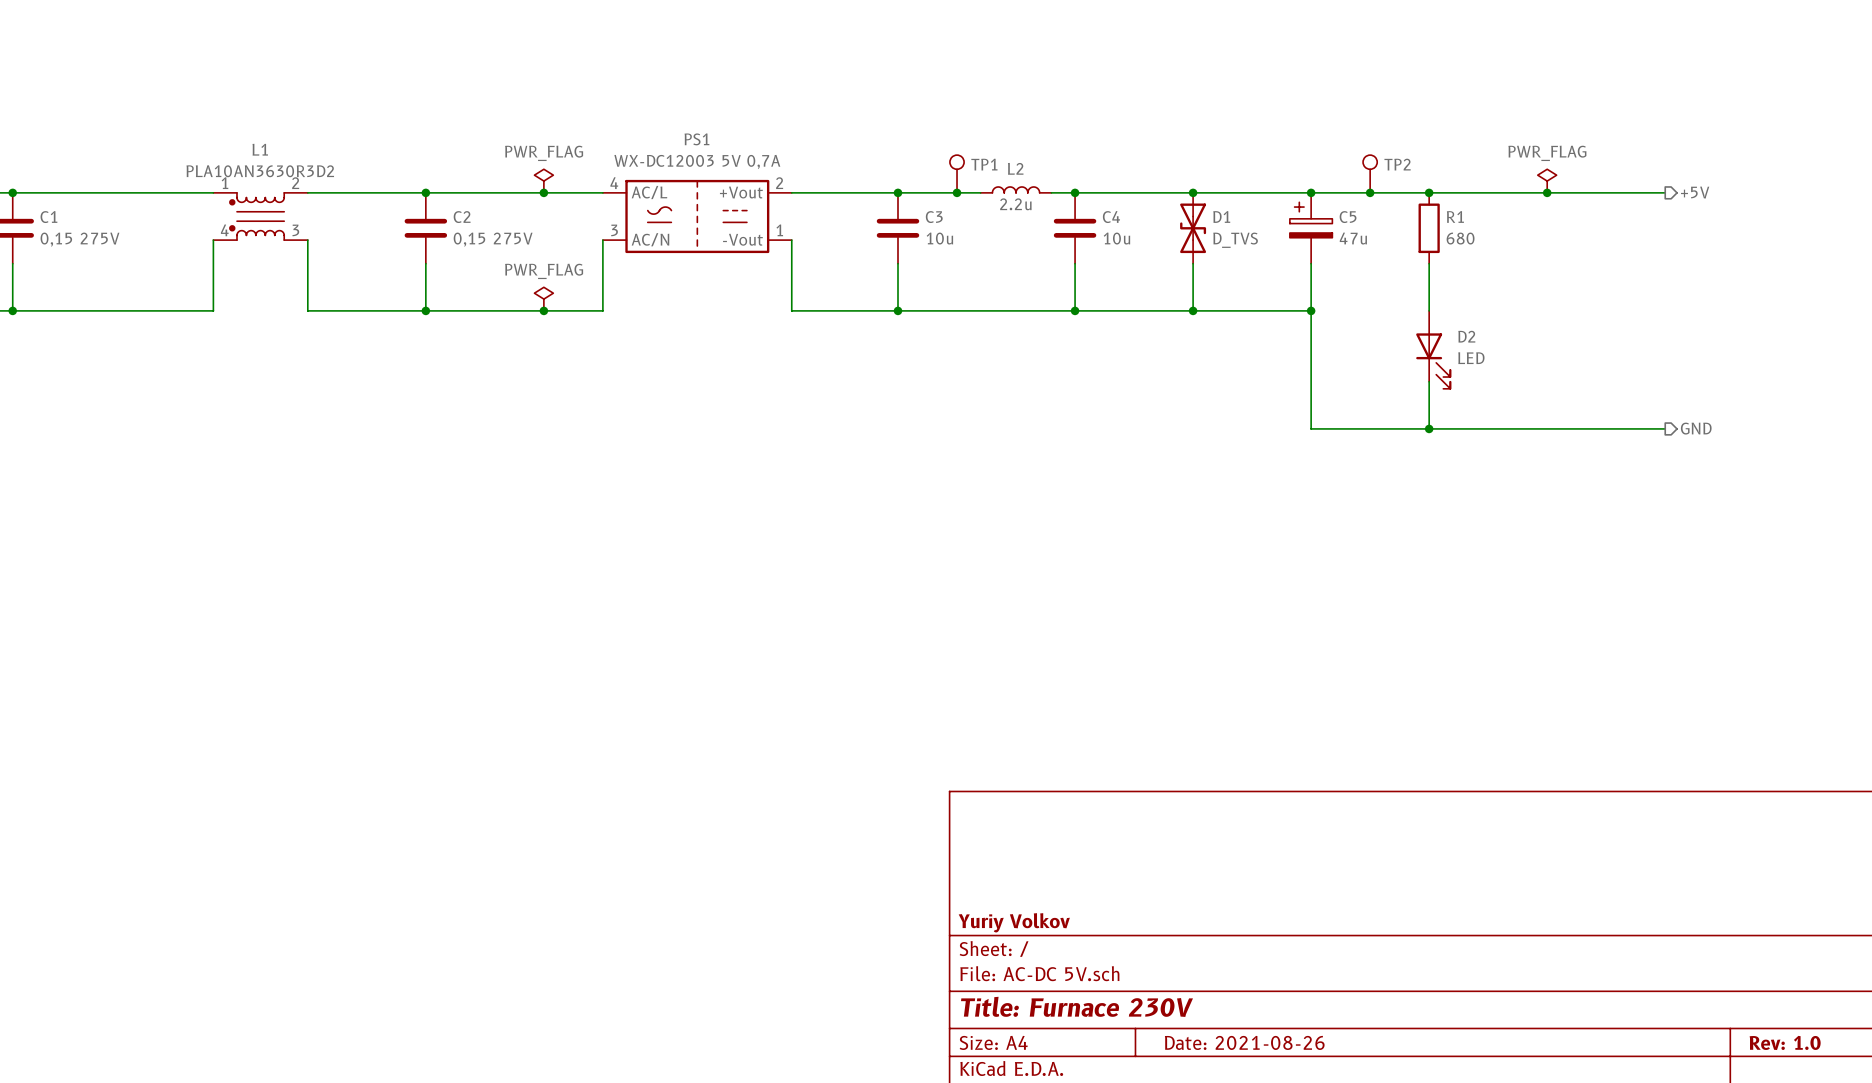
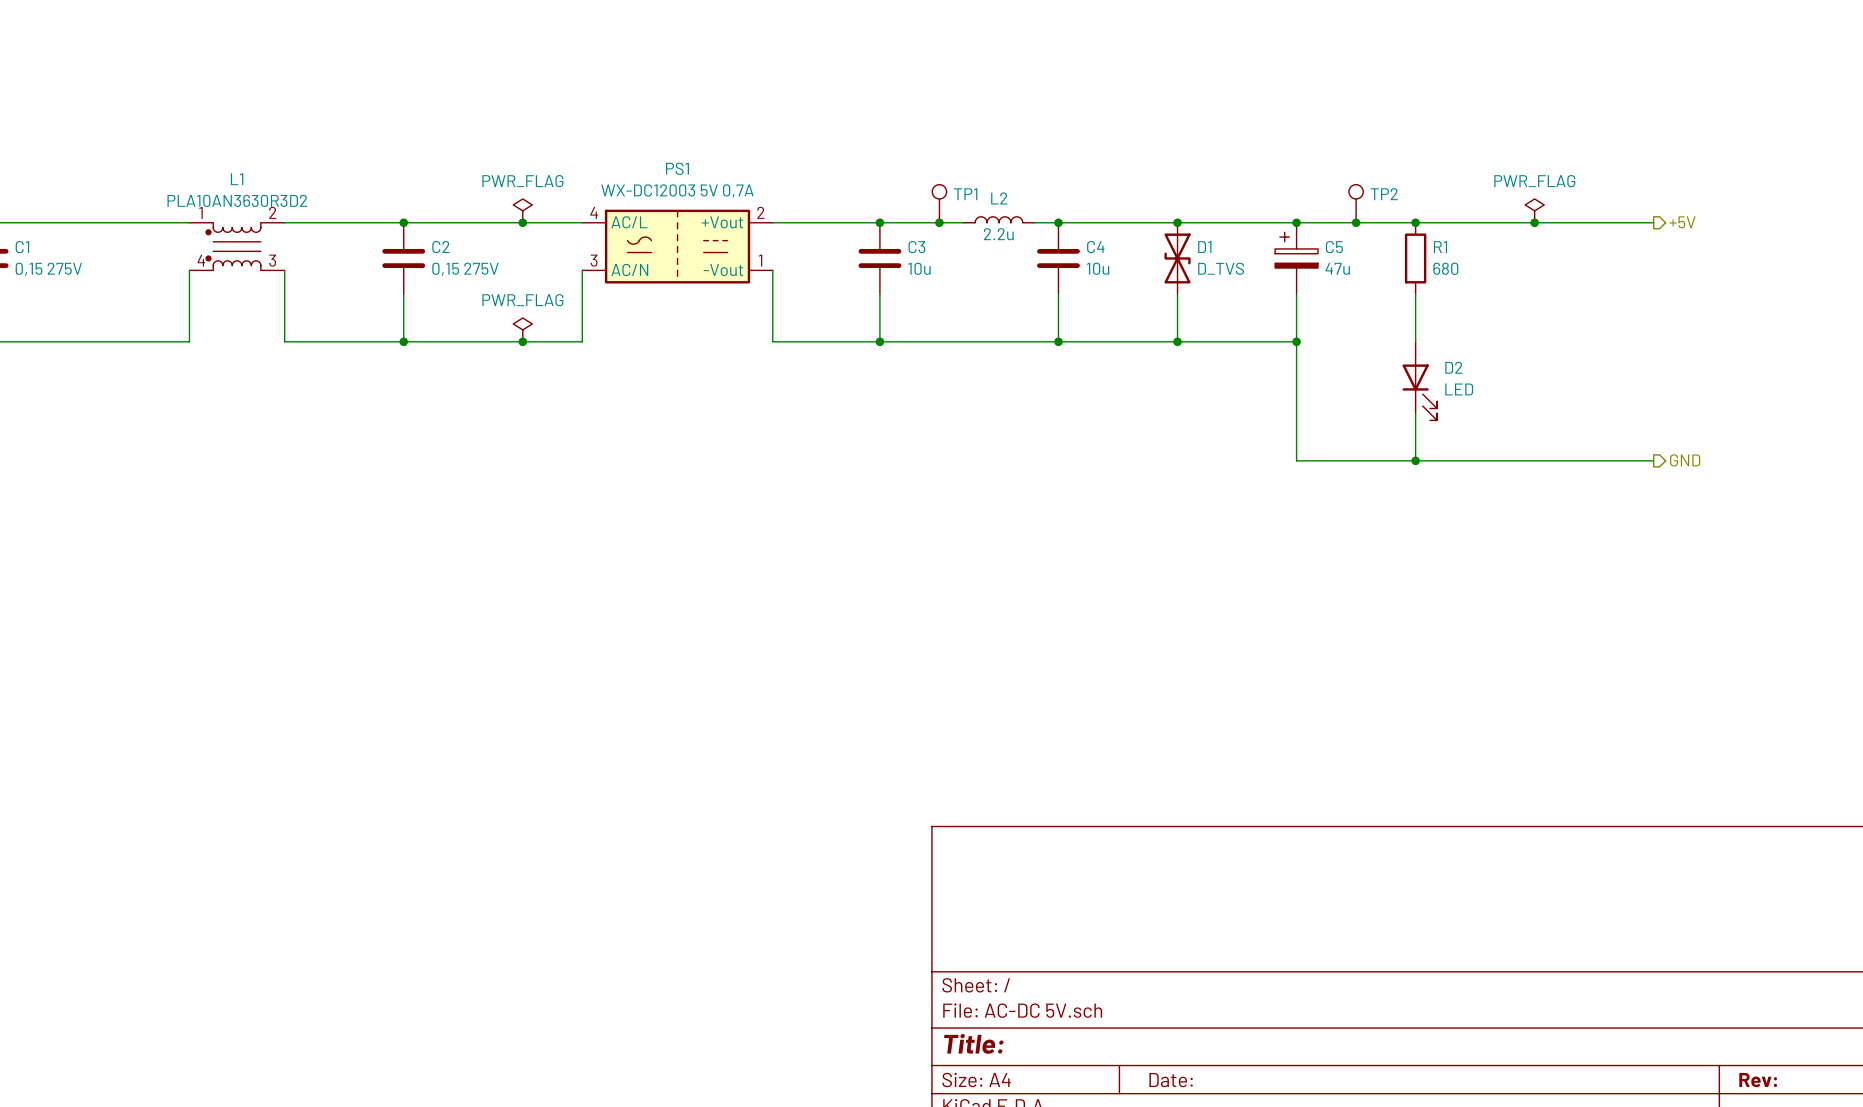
title block: Yuriy Volkov (1014, 922) -> none
title block: Title: Furnace 230V (1076, 1006) -> Title: (973, 1043)
title block: Date: 2021-08-26 (1244, 1042) -> Date: (1171, 1080)
title block: Rev: 1.0 (1785, 1042) -> Rev: (1758, 1080)

